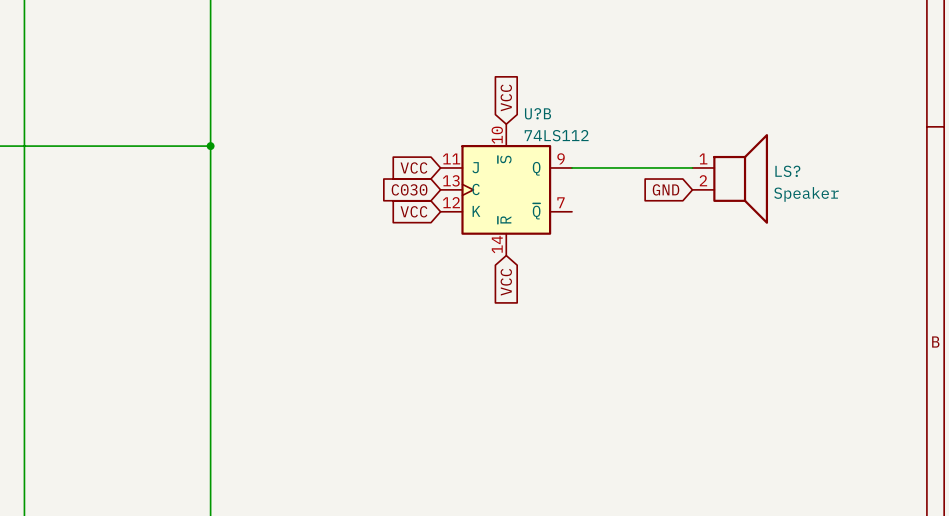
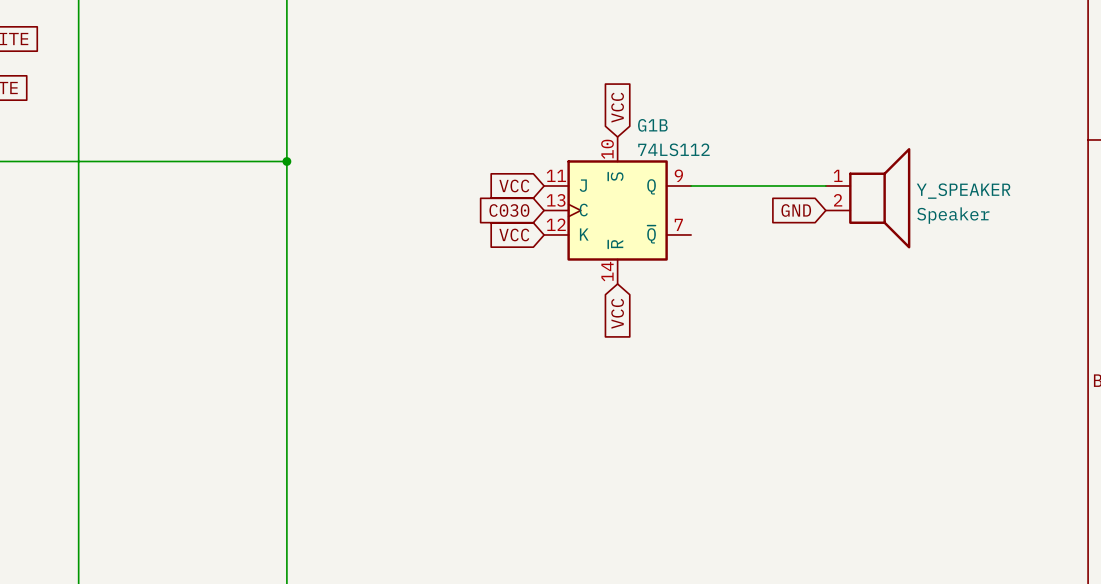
U?B name: U?B (538, 113) -> G1B (652, 125)
LS? name: LS? (787, 171) -> Y_SPEAKER (963, 191)

